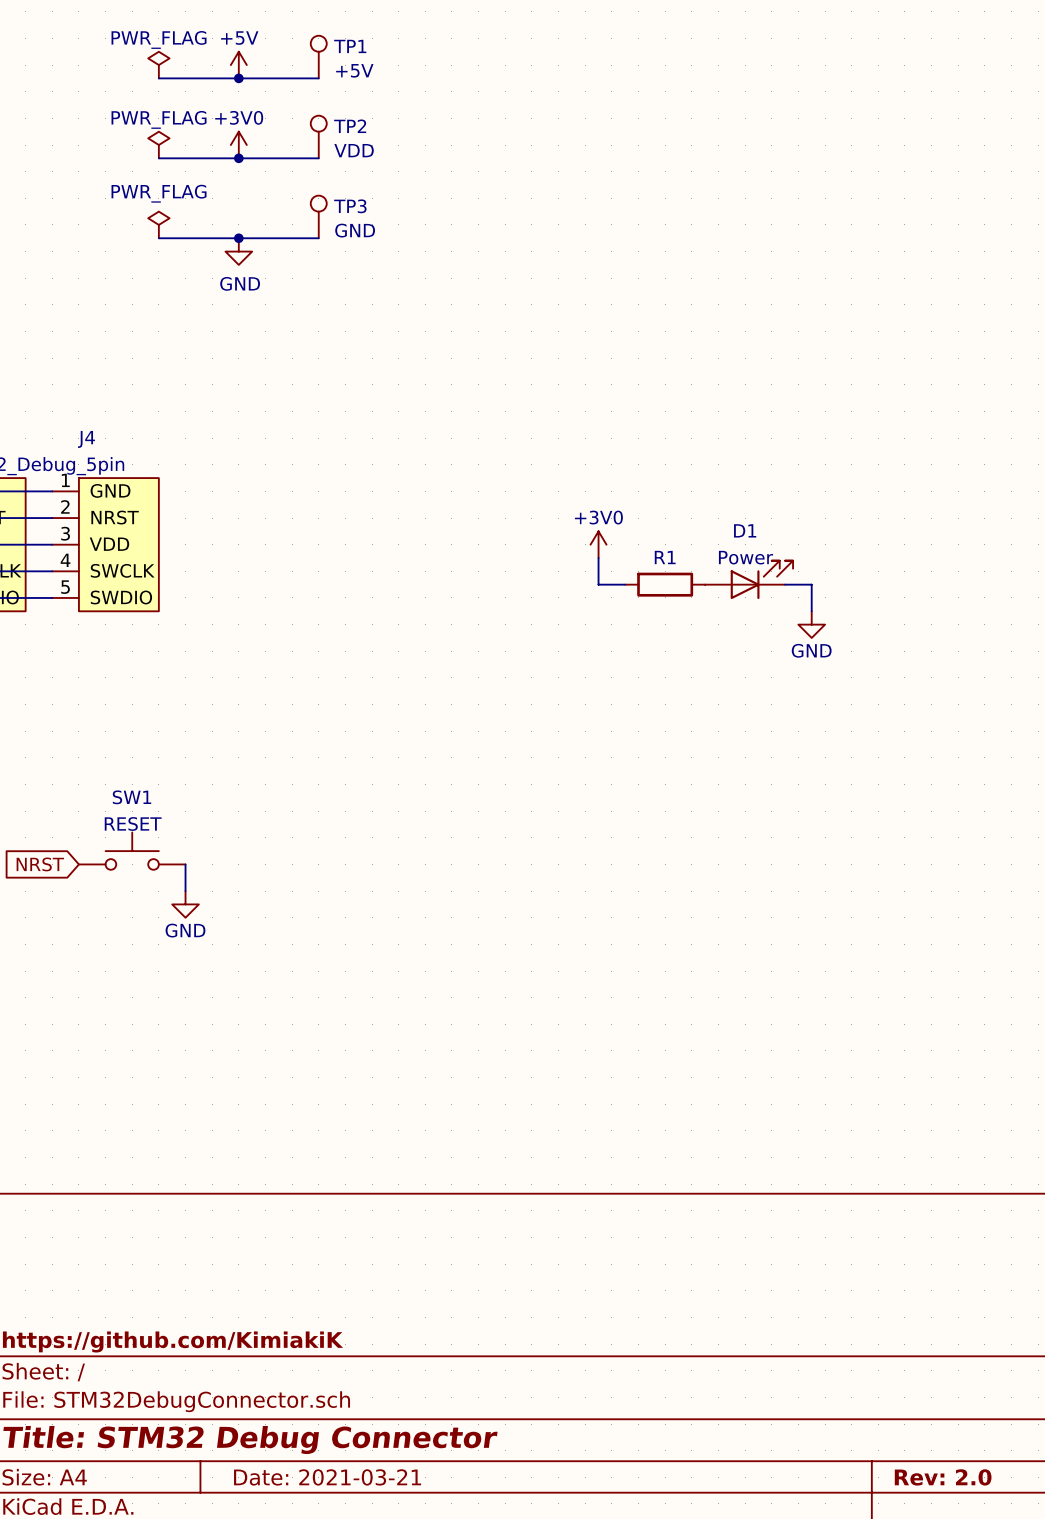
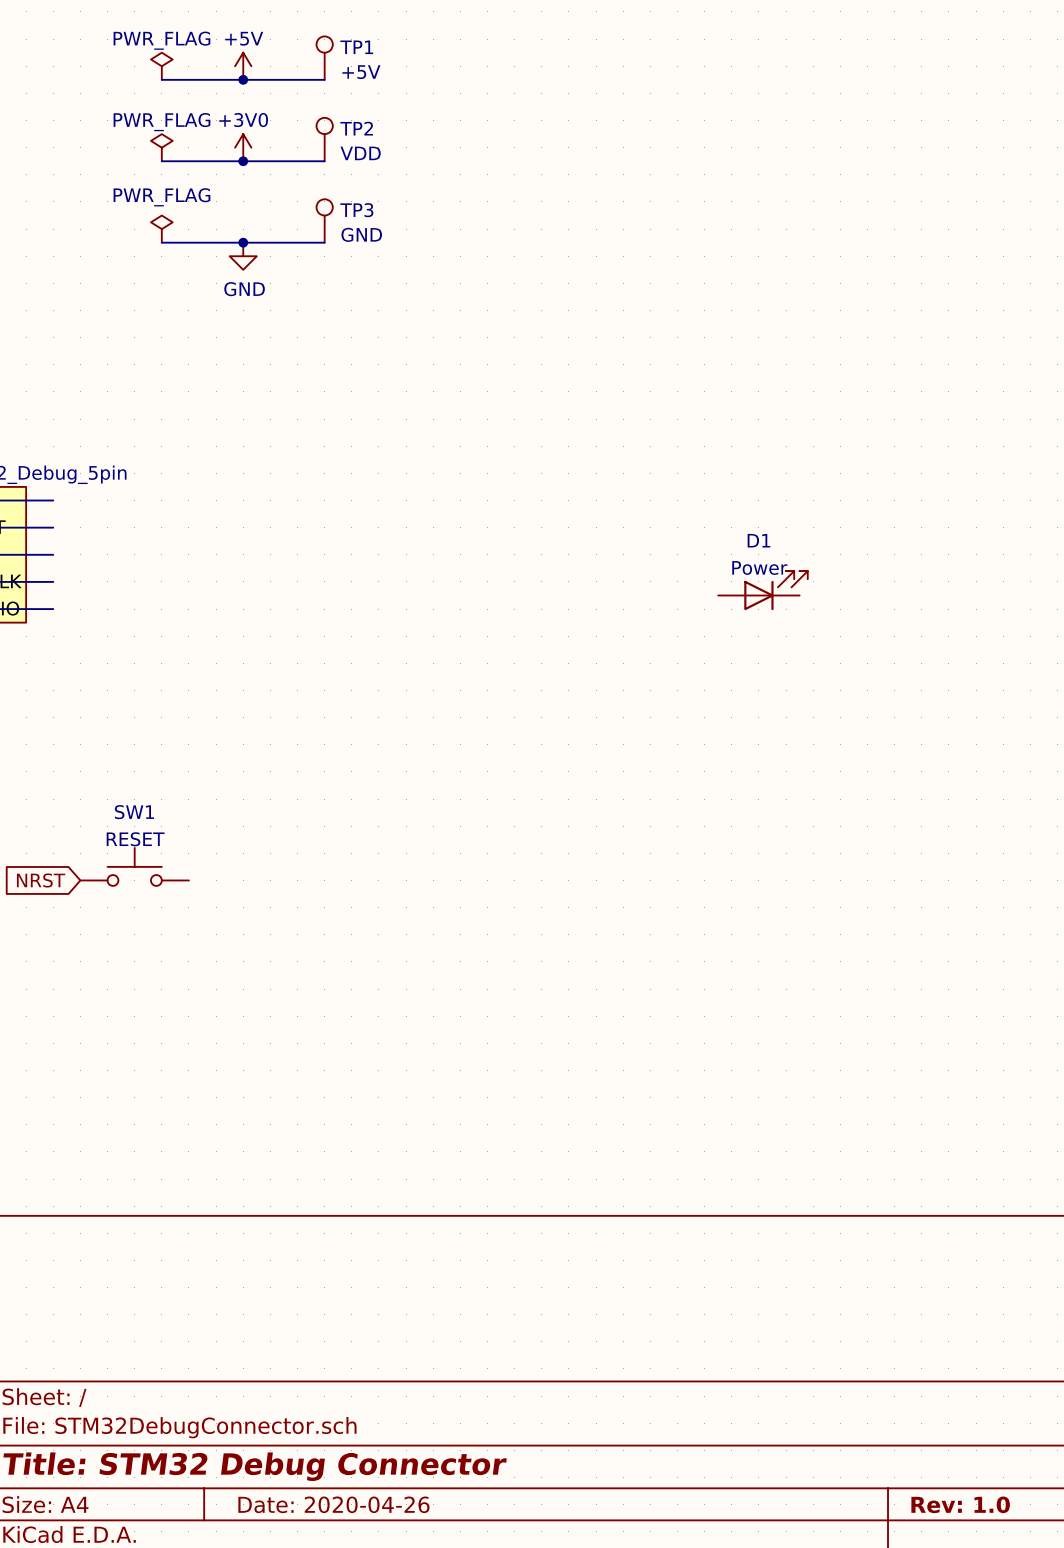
J4: (105, 544) -> none
power symbol: +3V0 (598, 544) -> none
wire: (598, 558) (598, 584) (625, 584) -> none
R1: (665, 584) -> none
wire: (785, 584) (811, 584) (811, 611) -> none
power symbol: GND (811, 624) -> none
wire: (185, 864) (185, 891) -> none
power symbol: GND (185, 904) -> none
title block: https://github.com/KimiakiK (173, 1341) -> none
title block: Date: 2021-03-21 (327, 1477) -> Date: 2020-04-26 (333, 1504)
title block: Rev: 2.0 (943, 1477) -> Rev: 1.0 (960, 1504)

